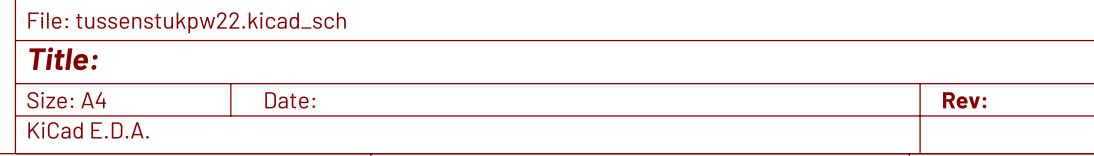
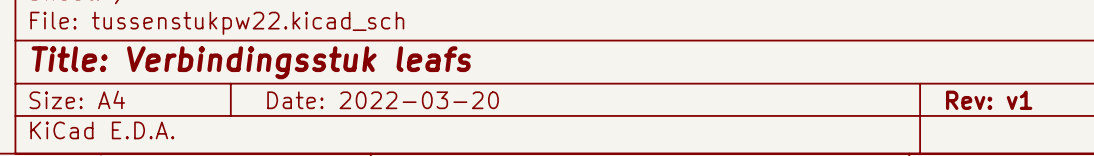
title block: Title: (63, 58) -> Title: Verbindingsstuk leafs (251, 62)
title block: Date: (290, 100) -> Date: 2022-03-20 (383, 100)
title block: Rev: (964, 100) -> Rev: v1 (989, 100)

